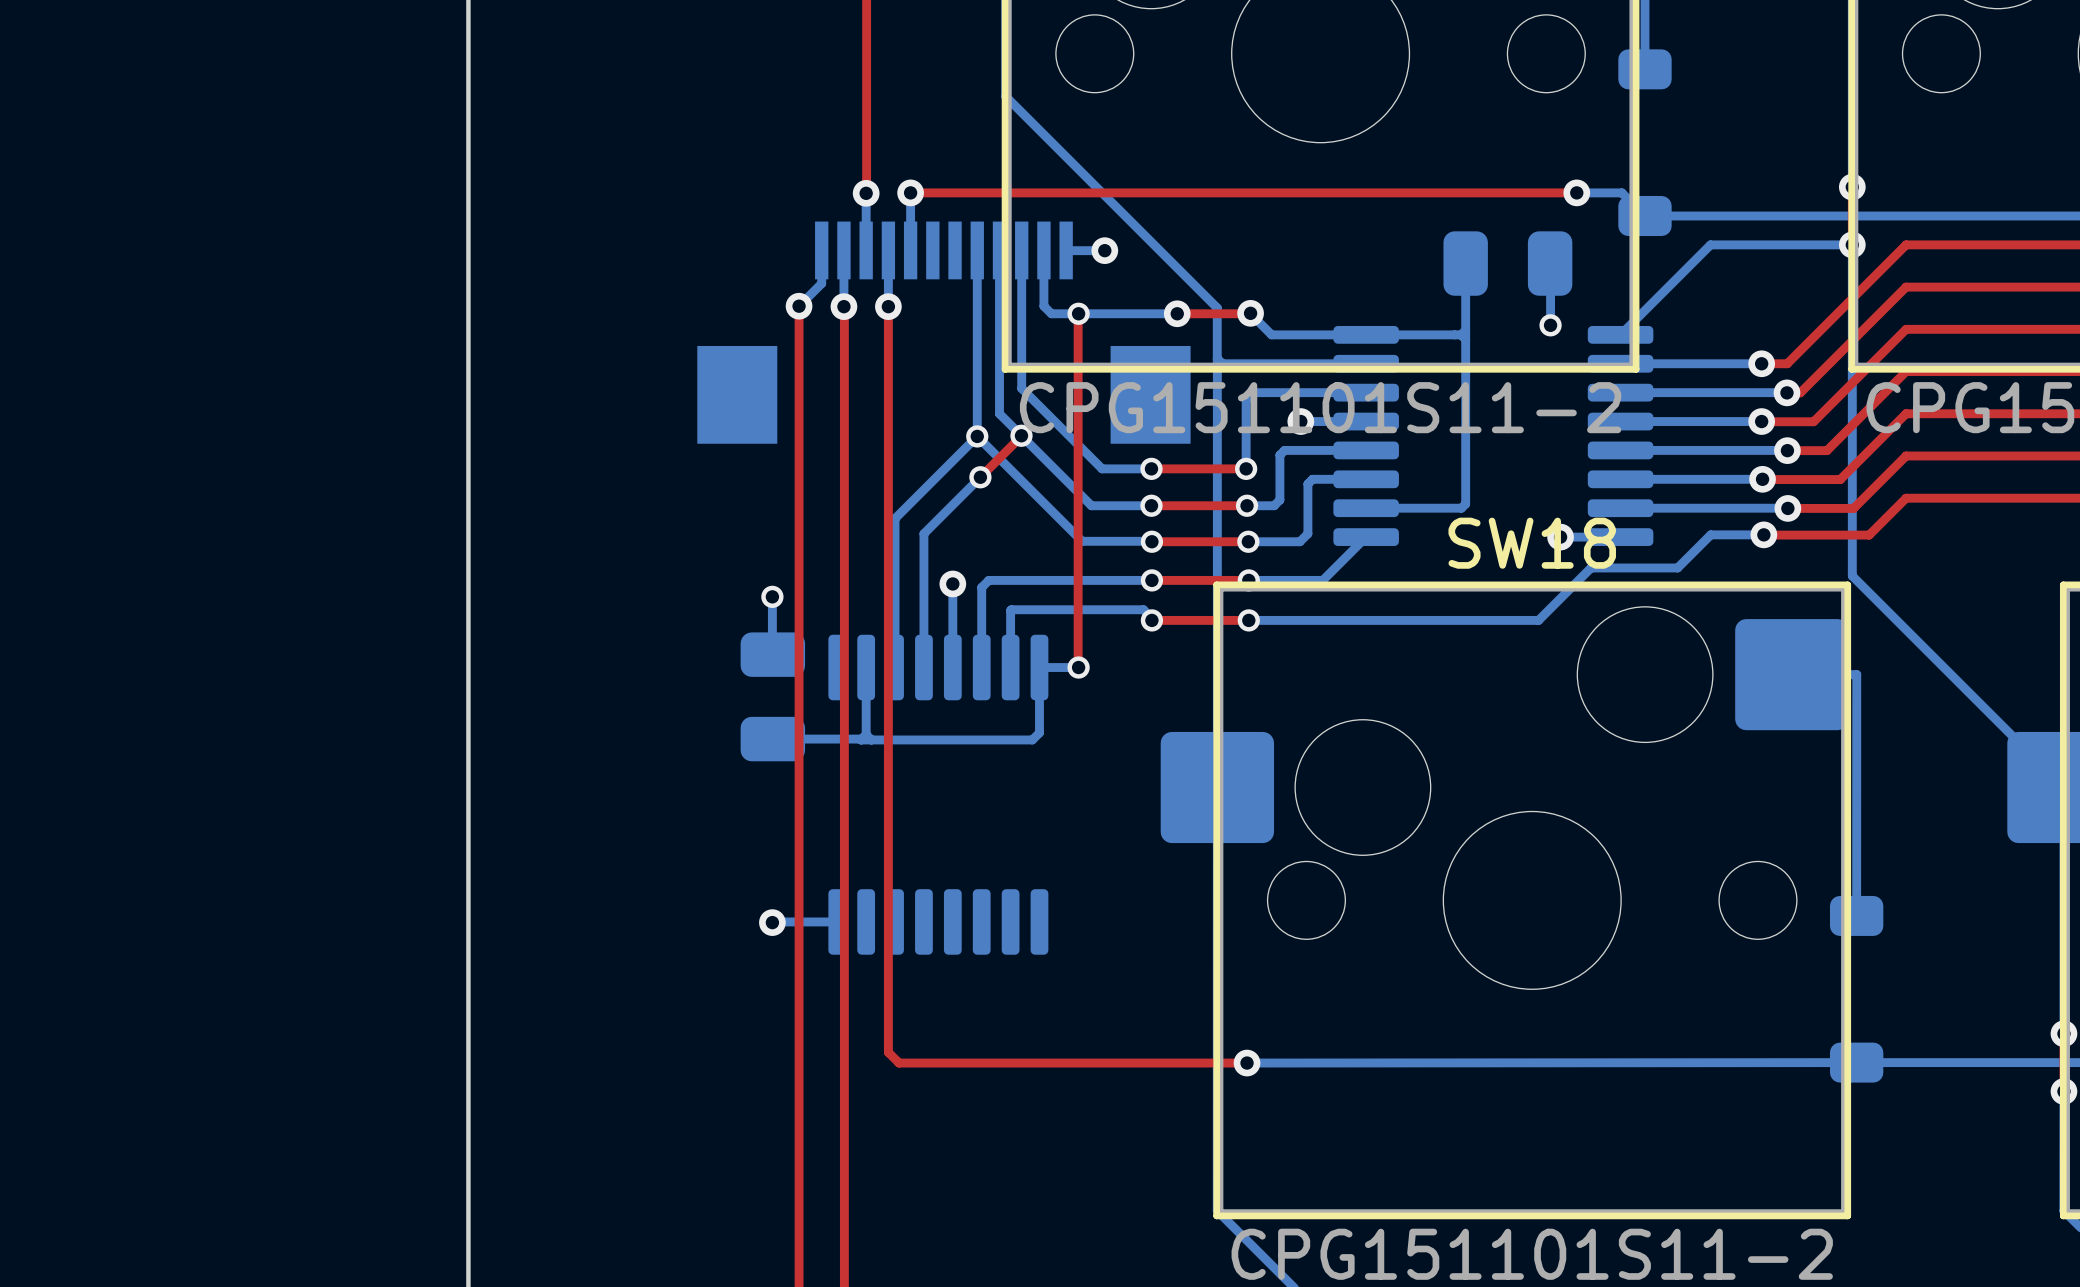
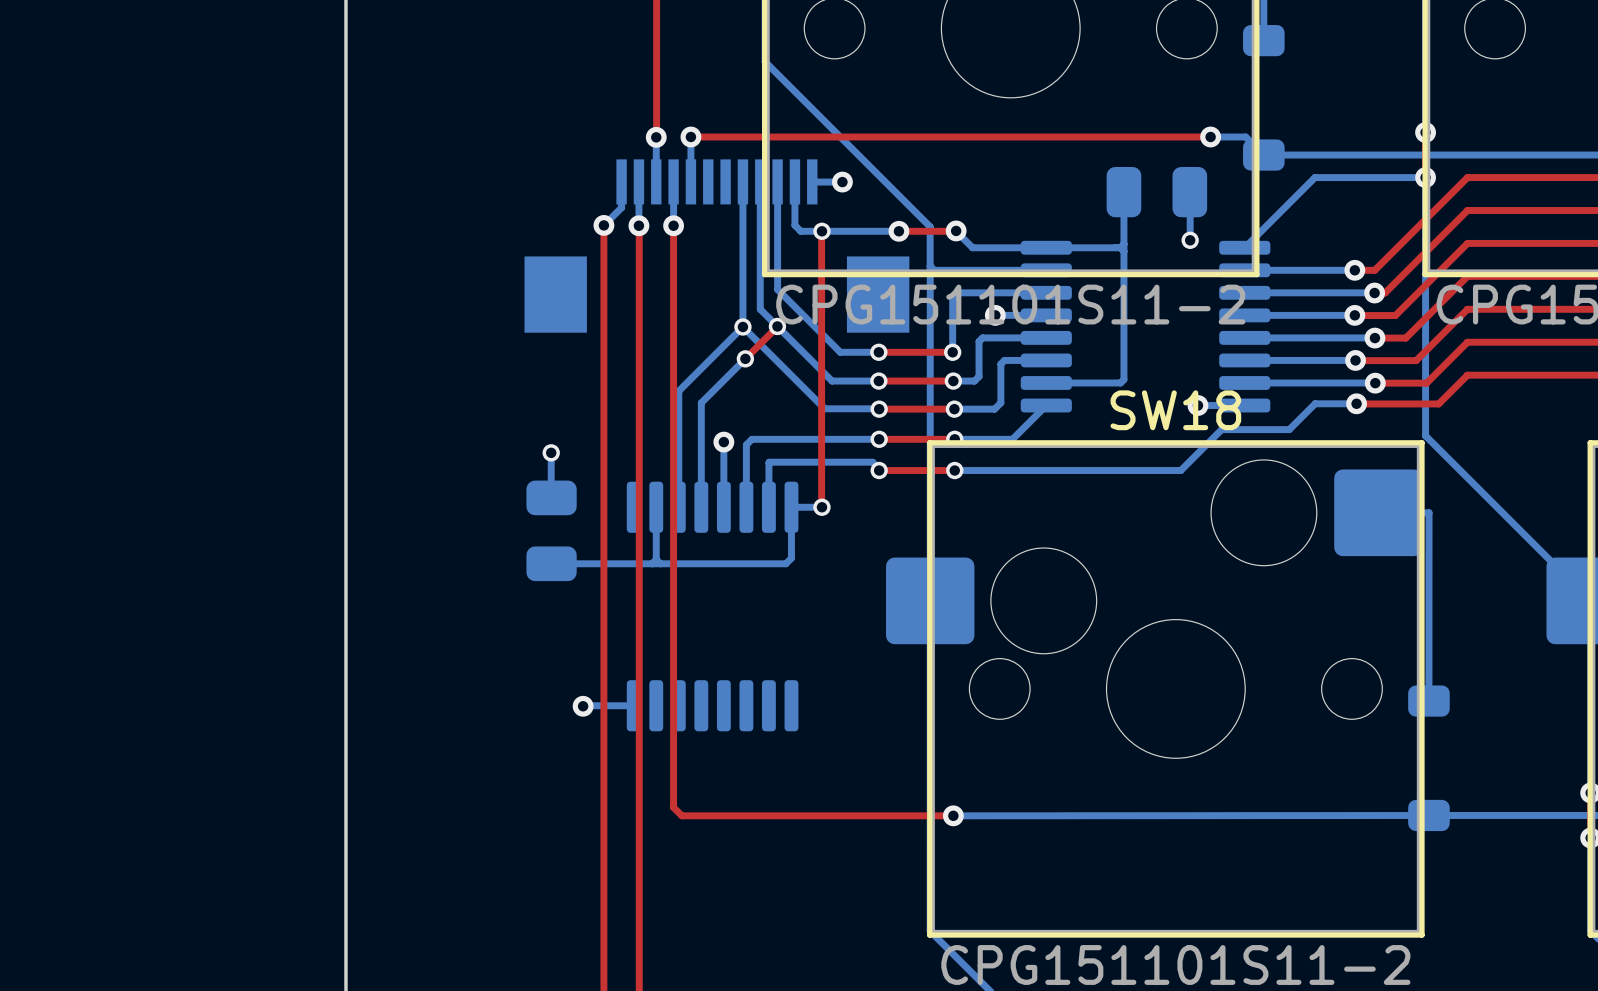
bottom track: (772, 596) (772, 654) -> (551, 452) (551, 497)
via position: (772, 596) -> (551, 452)
part position: (772, 696) -> (551, 530)
bottom track: (772, 739) (860, 739) -> (551, 563) (652, 563)

